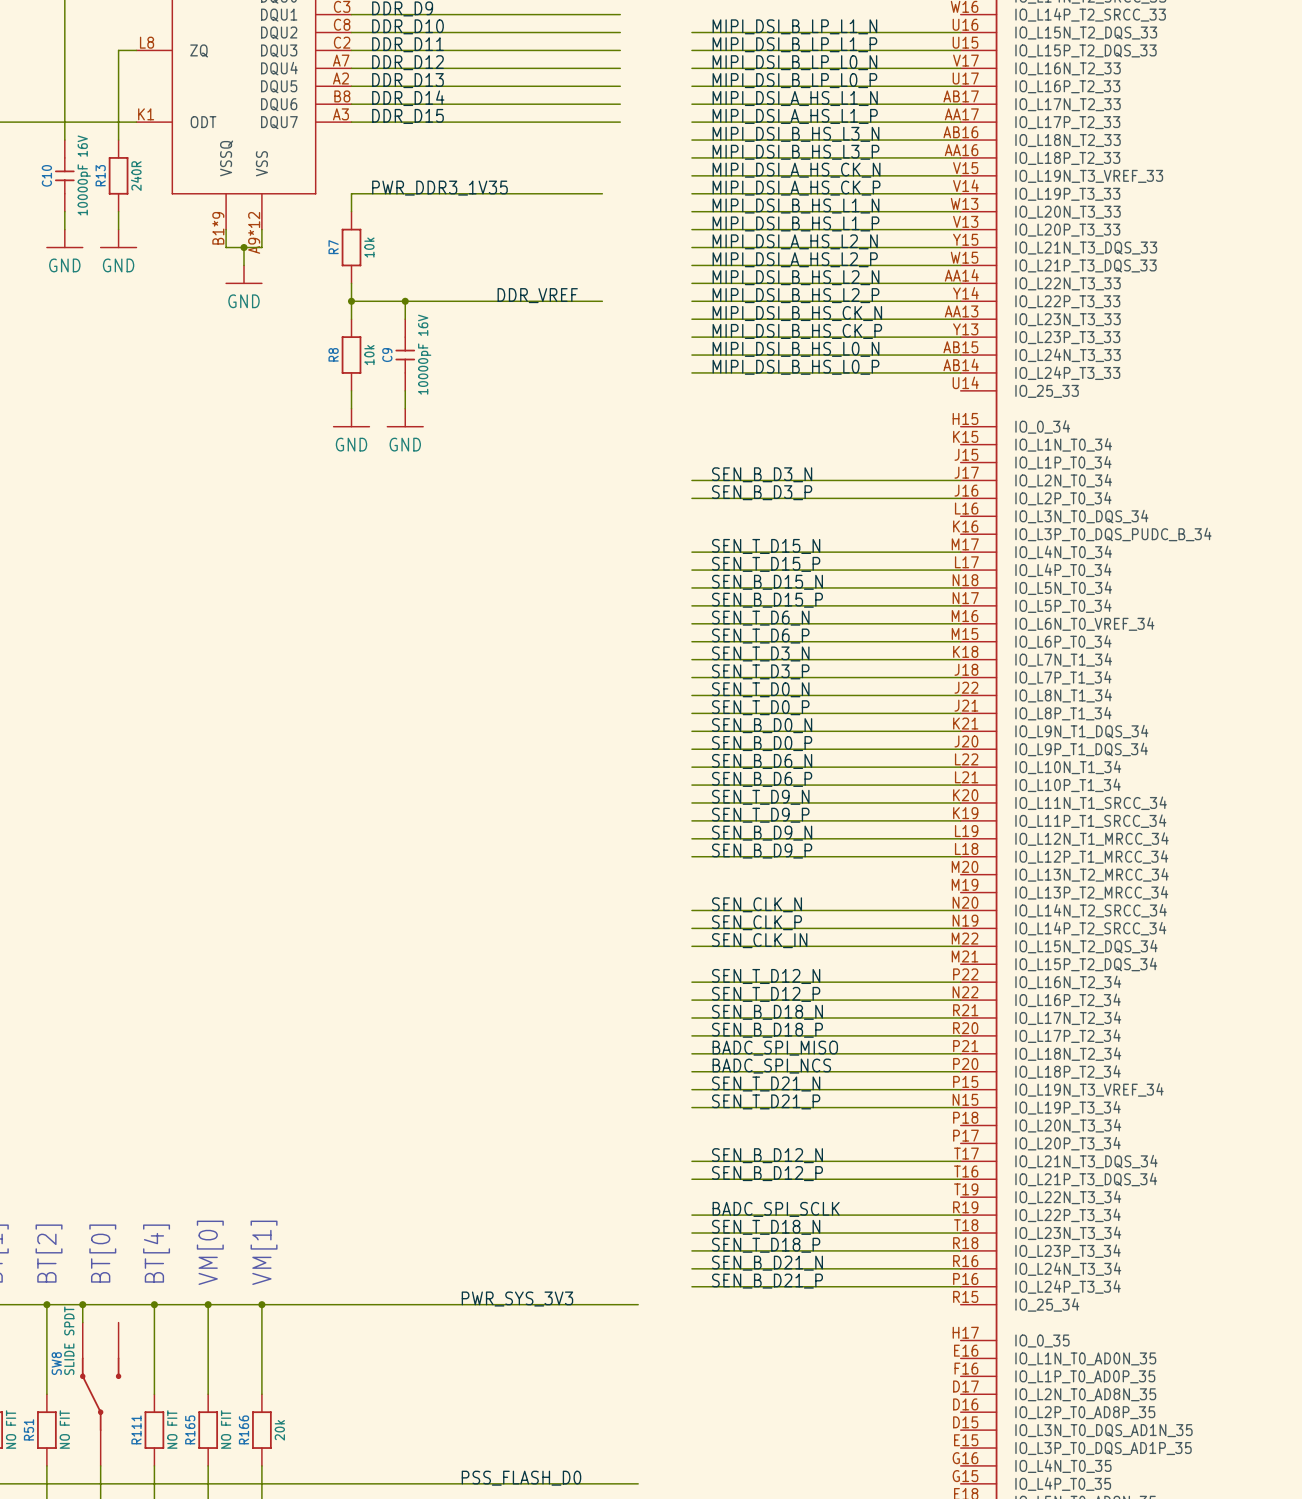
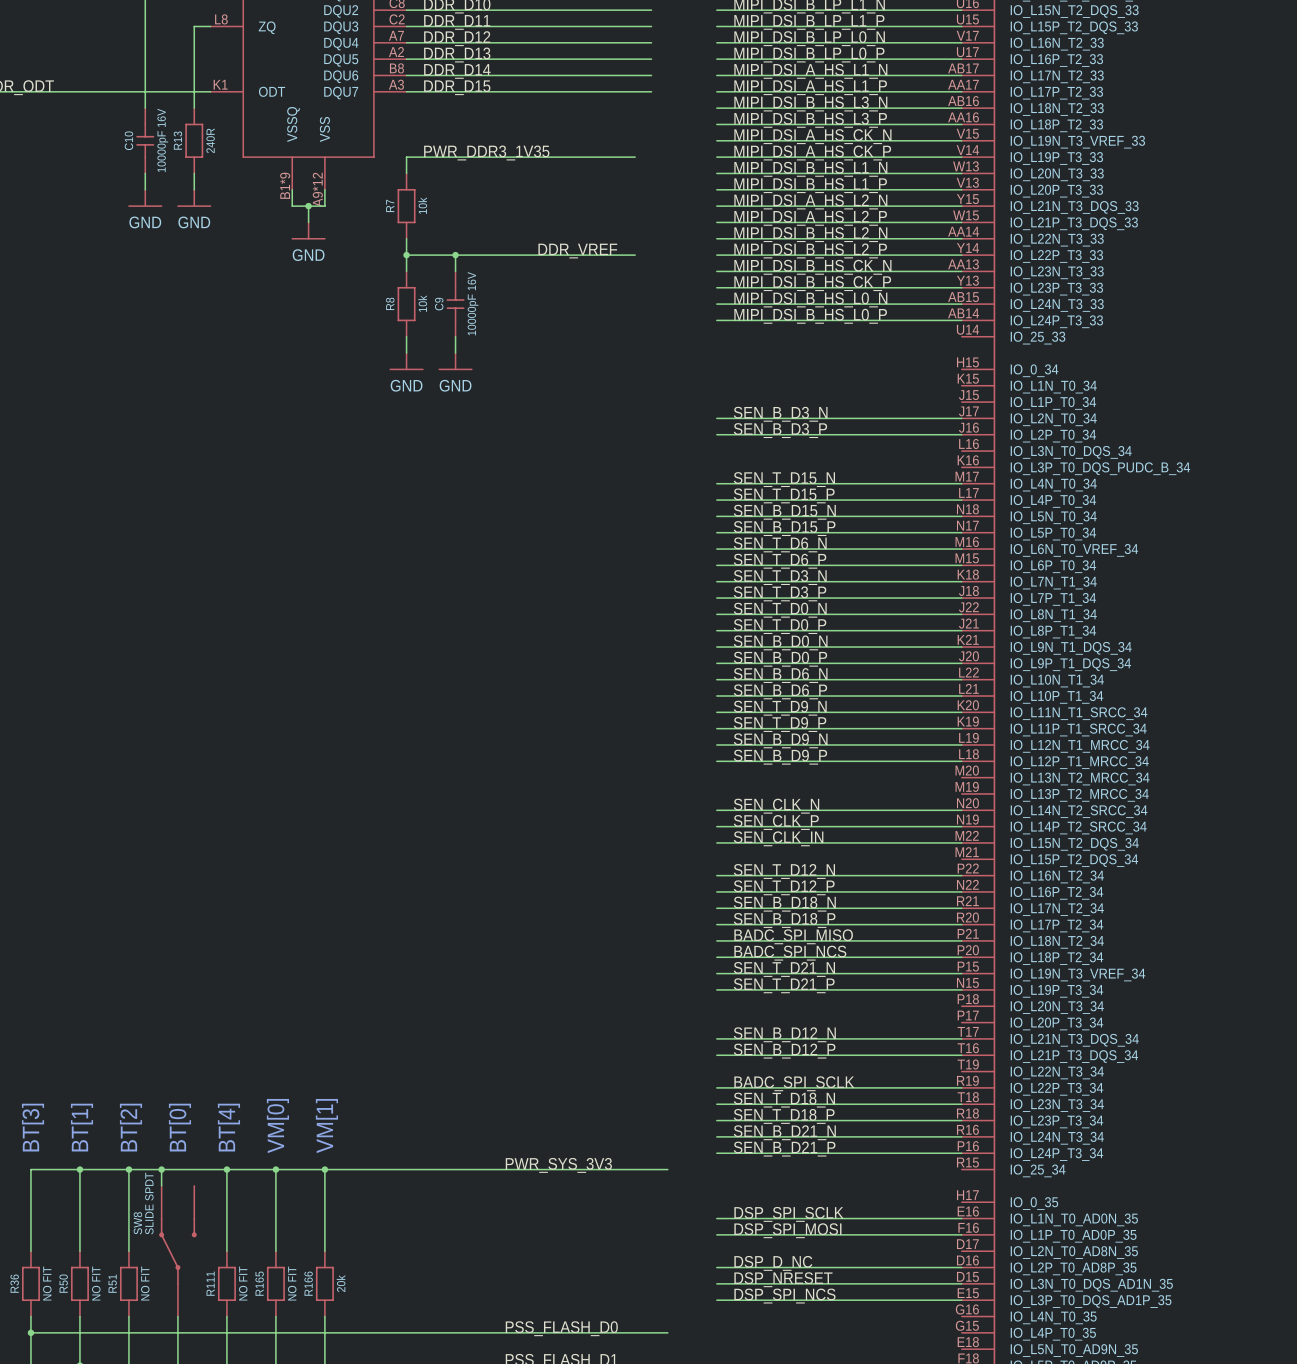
label: none -> DSP_SPI_SCLK (788, 1214)
wire: none -> (716, 1218) (961, 1218)
label: none -> DSP_SPI_MOSI (787, 1230)
wire: none -> (716, 1234) (961, 1234)
label: none -> DSP_D_NC (773, 1263)
wire: none -> (716, 1267) (961, 1267)
label: none -> DSP_NRESET (783, 1279)
wire: none -> (716, 1283) (961, 1283)
label: none -> DSP_SPI_NCS (784, 1296)
wire: none -> (716, 1300) (961, 1300)

